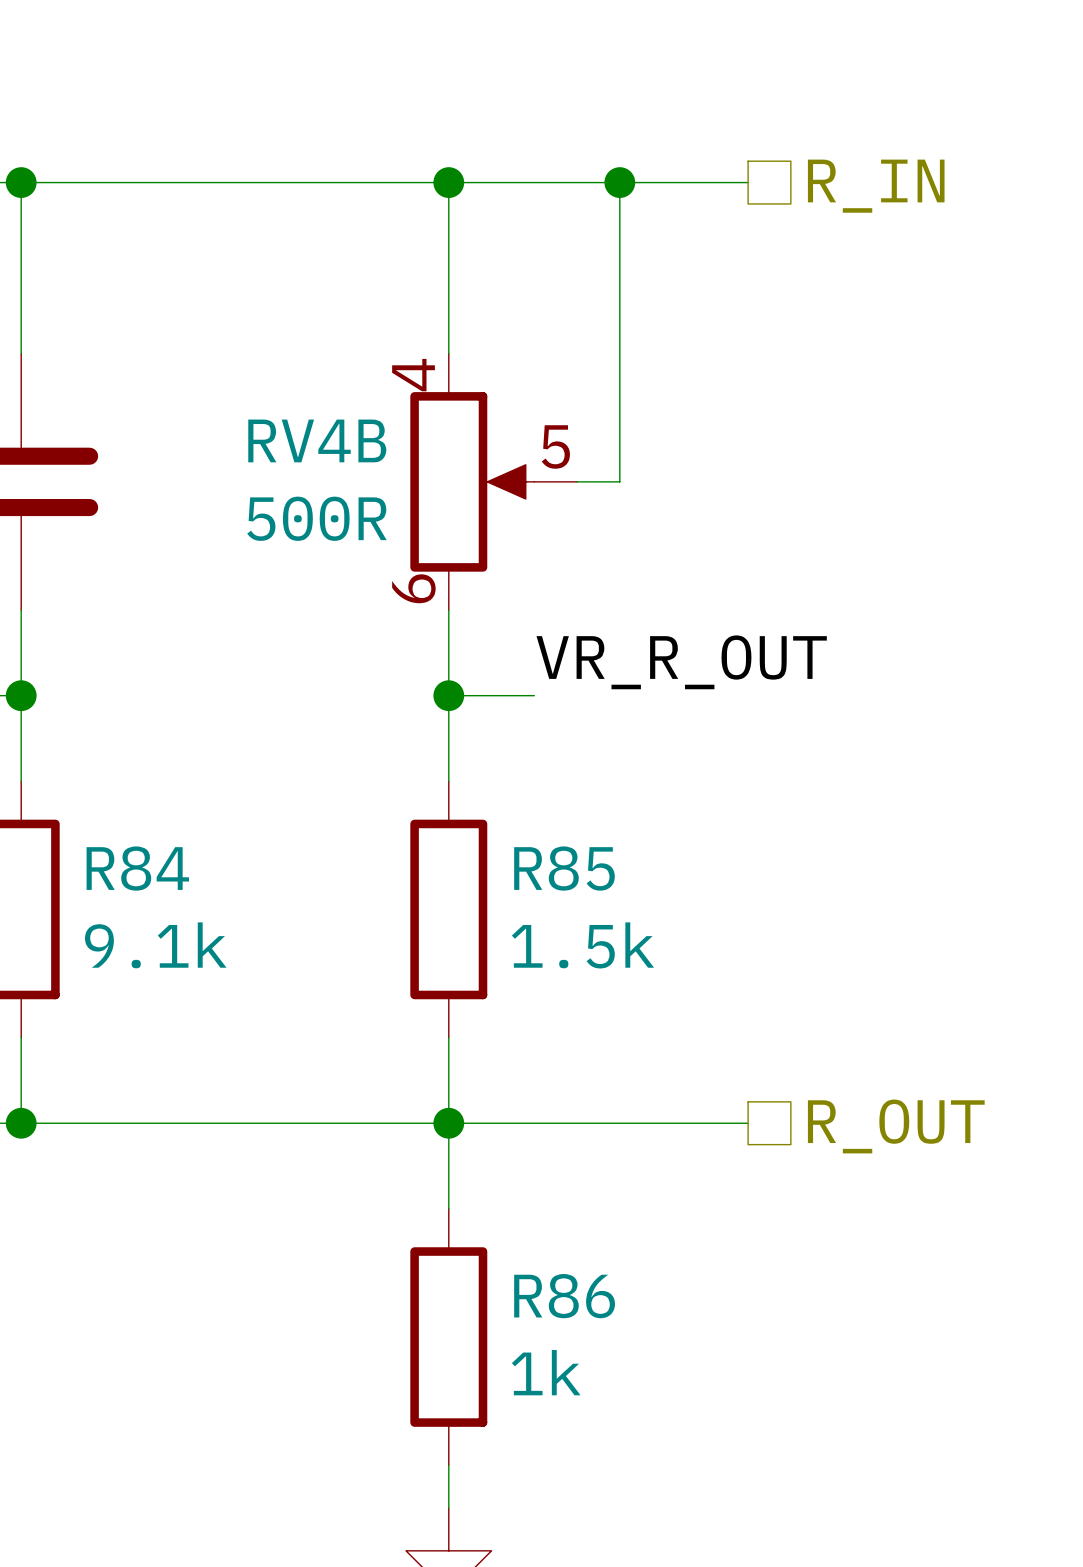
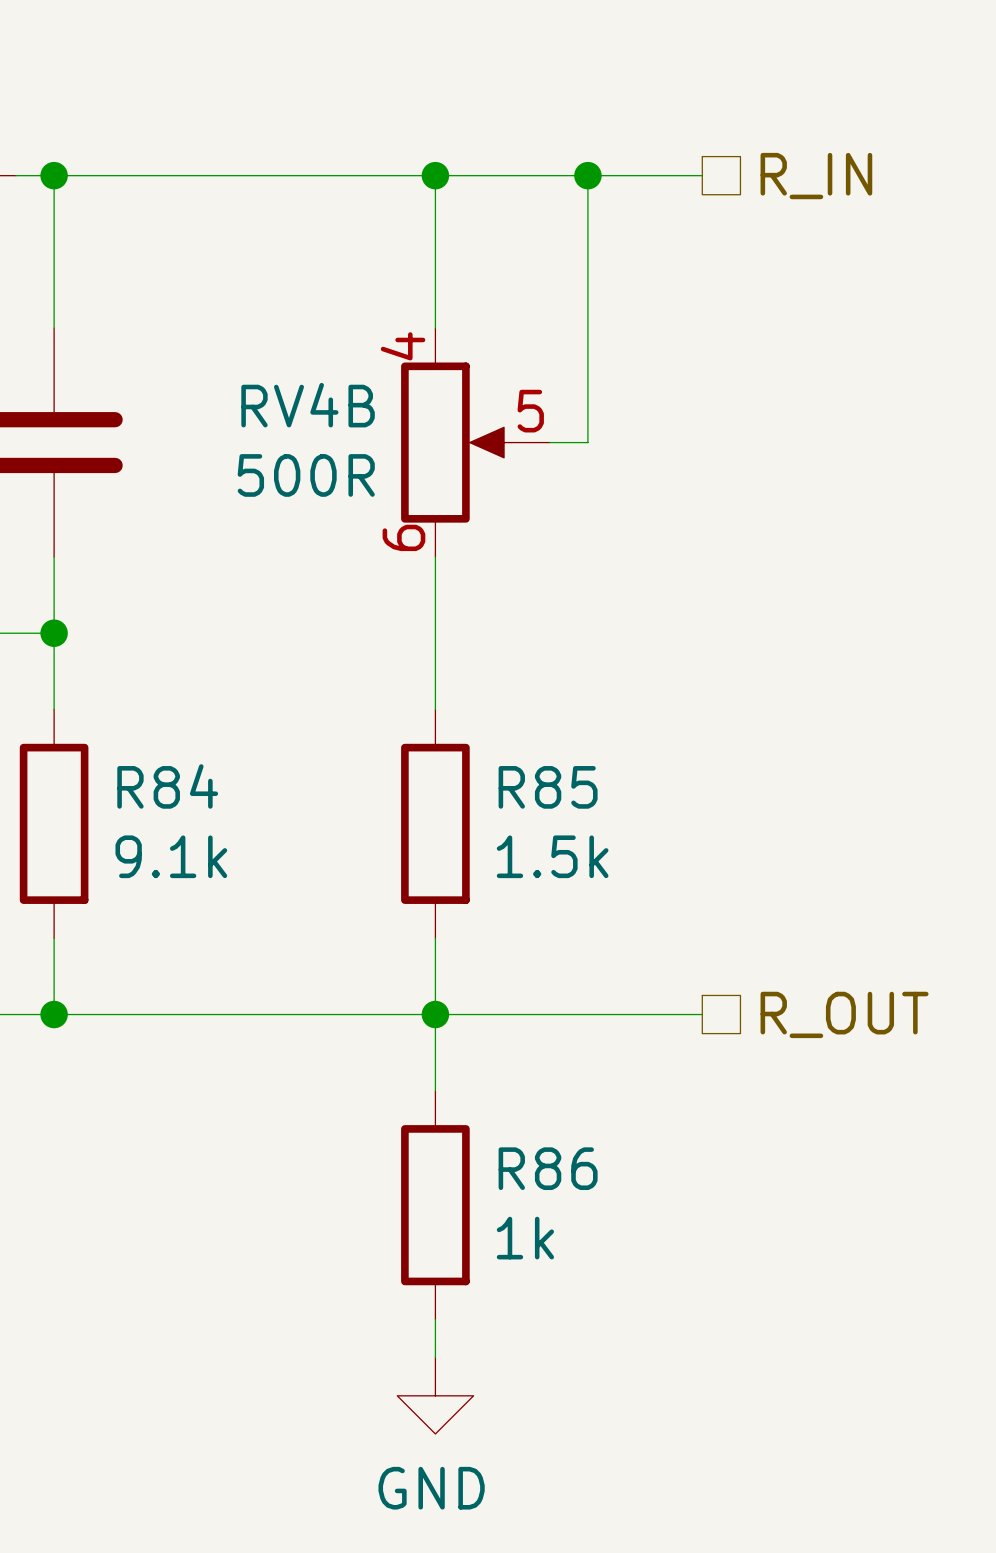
label: VR_R_OUT (681, 662) -> none
wire: (448, 695) (534, 695) -> none
junction: (448, 695) -> none

